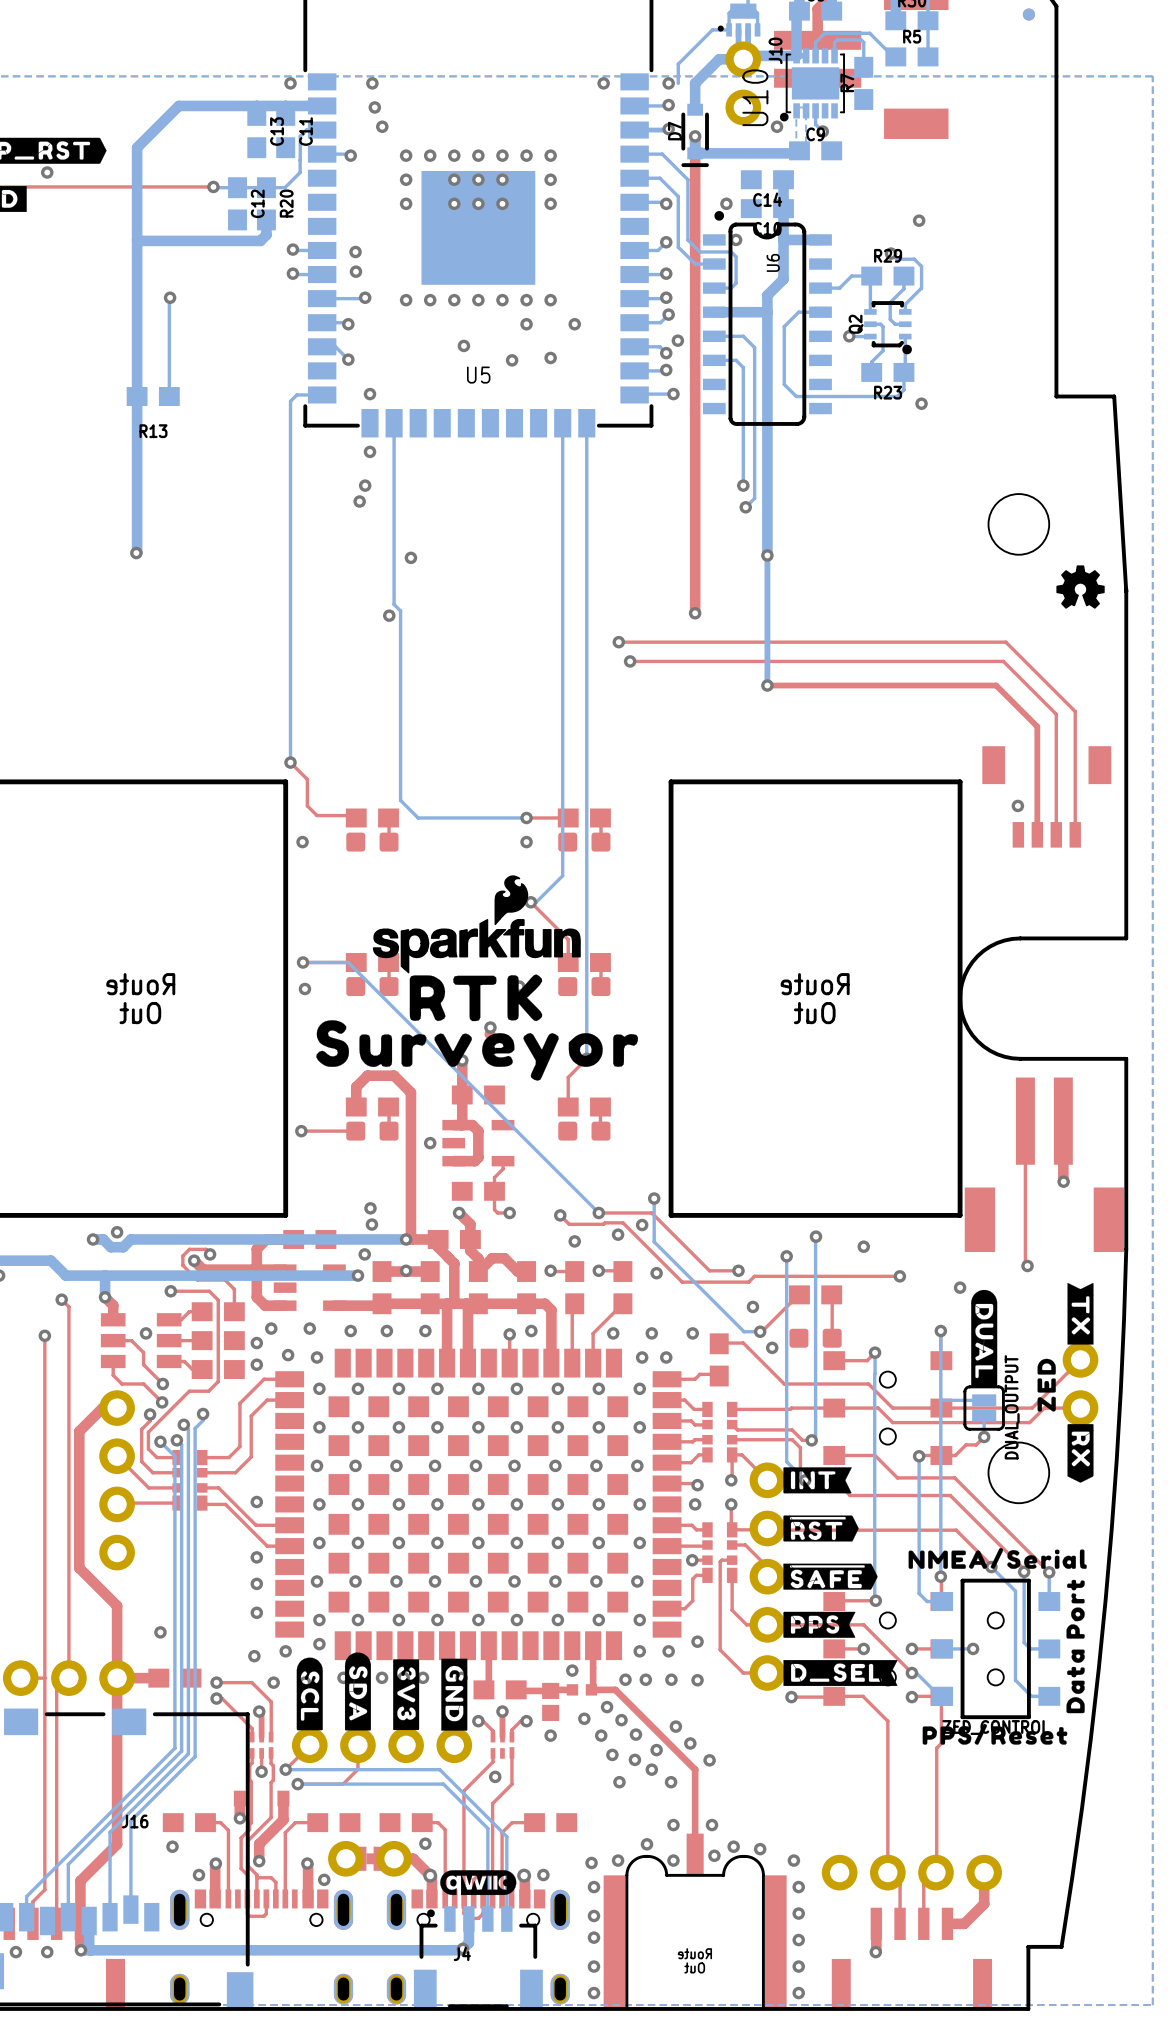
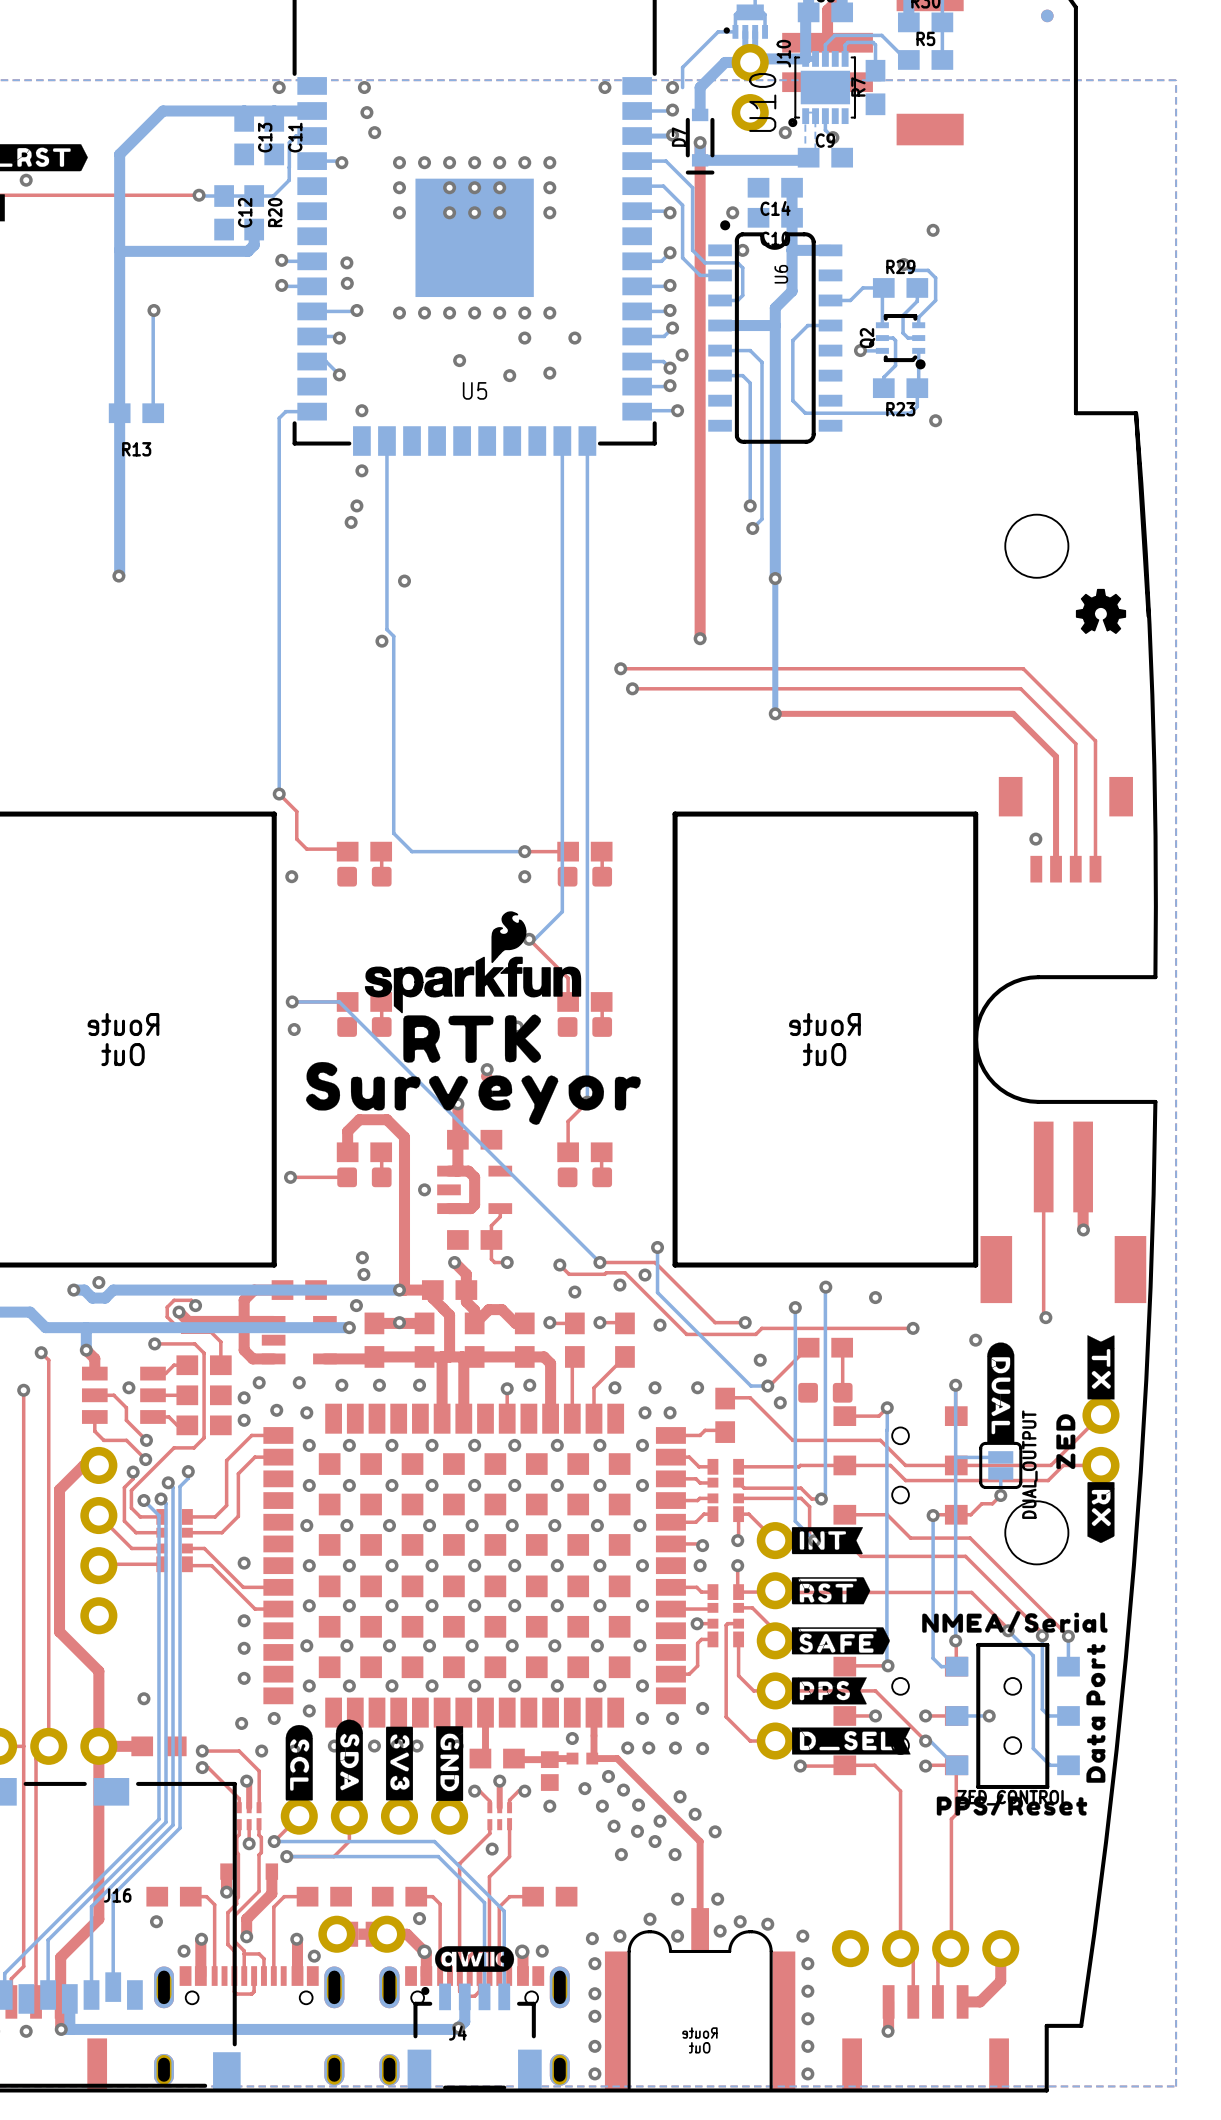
board edge: (1126, 589) (1126, 938) (1020, 938) (997, 943) (983, 950) (972, 961) (962, 983) (960, 998) (962, 1014) (972, 1035) (983, 1046) (997, 1054) (1020, 1058) (1126, 1058) (1126, 1249) (1120, 1389) (1111, 1529) (1090, 1738) (1061, 1946) -> (1136, 413) (1145, 553) (1152, 694) (1155, 836) (1155, 977) (1038, 977) (1014, 981) (994, 995) (984, 1008) (978, 1023) (975, 1039) (980, 1063) (988, 1077) (1000, 1089) (1014, 1097) (1038, 1101) (1155, 1101) (1150, 1287) (1133, 1565) (1116, 1749) (1081, 2025)

